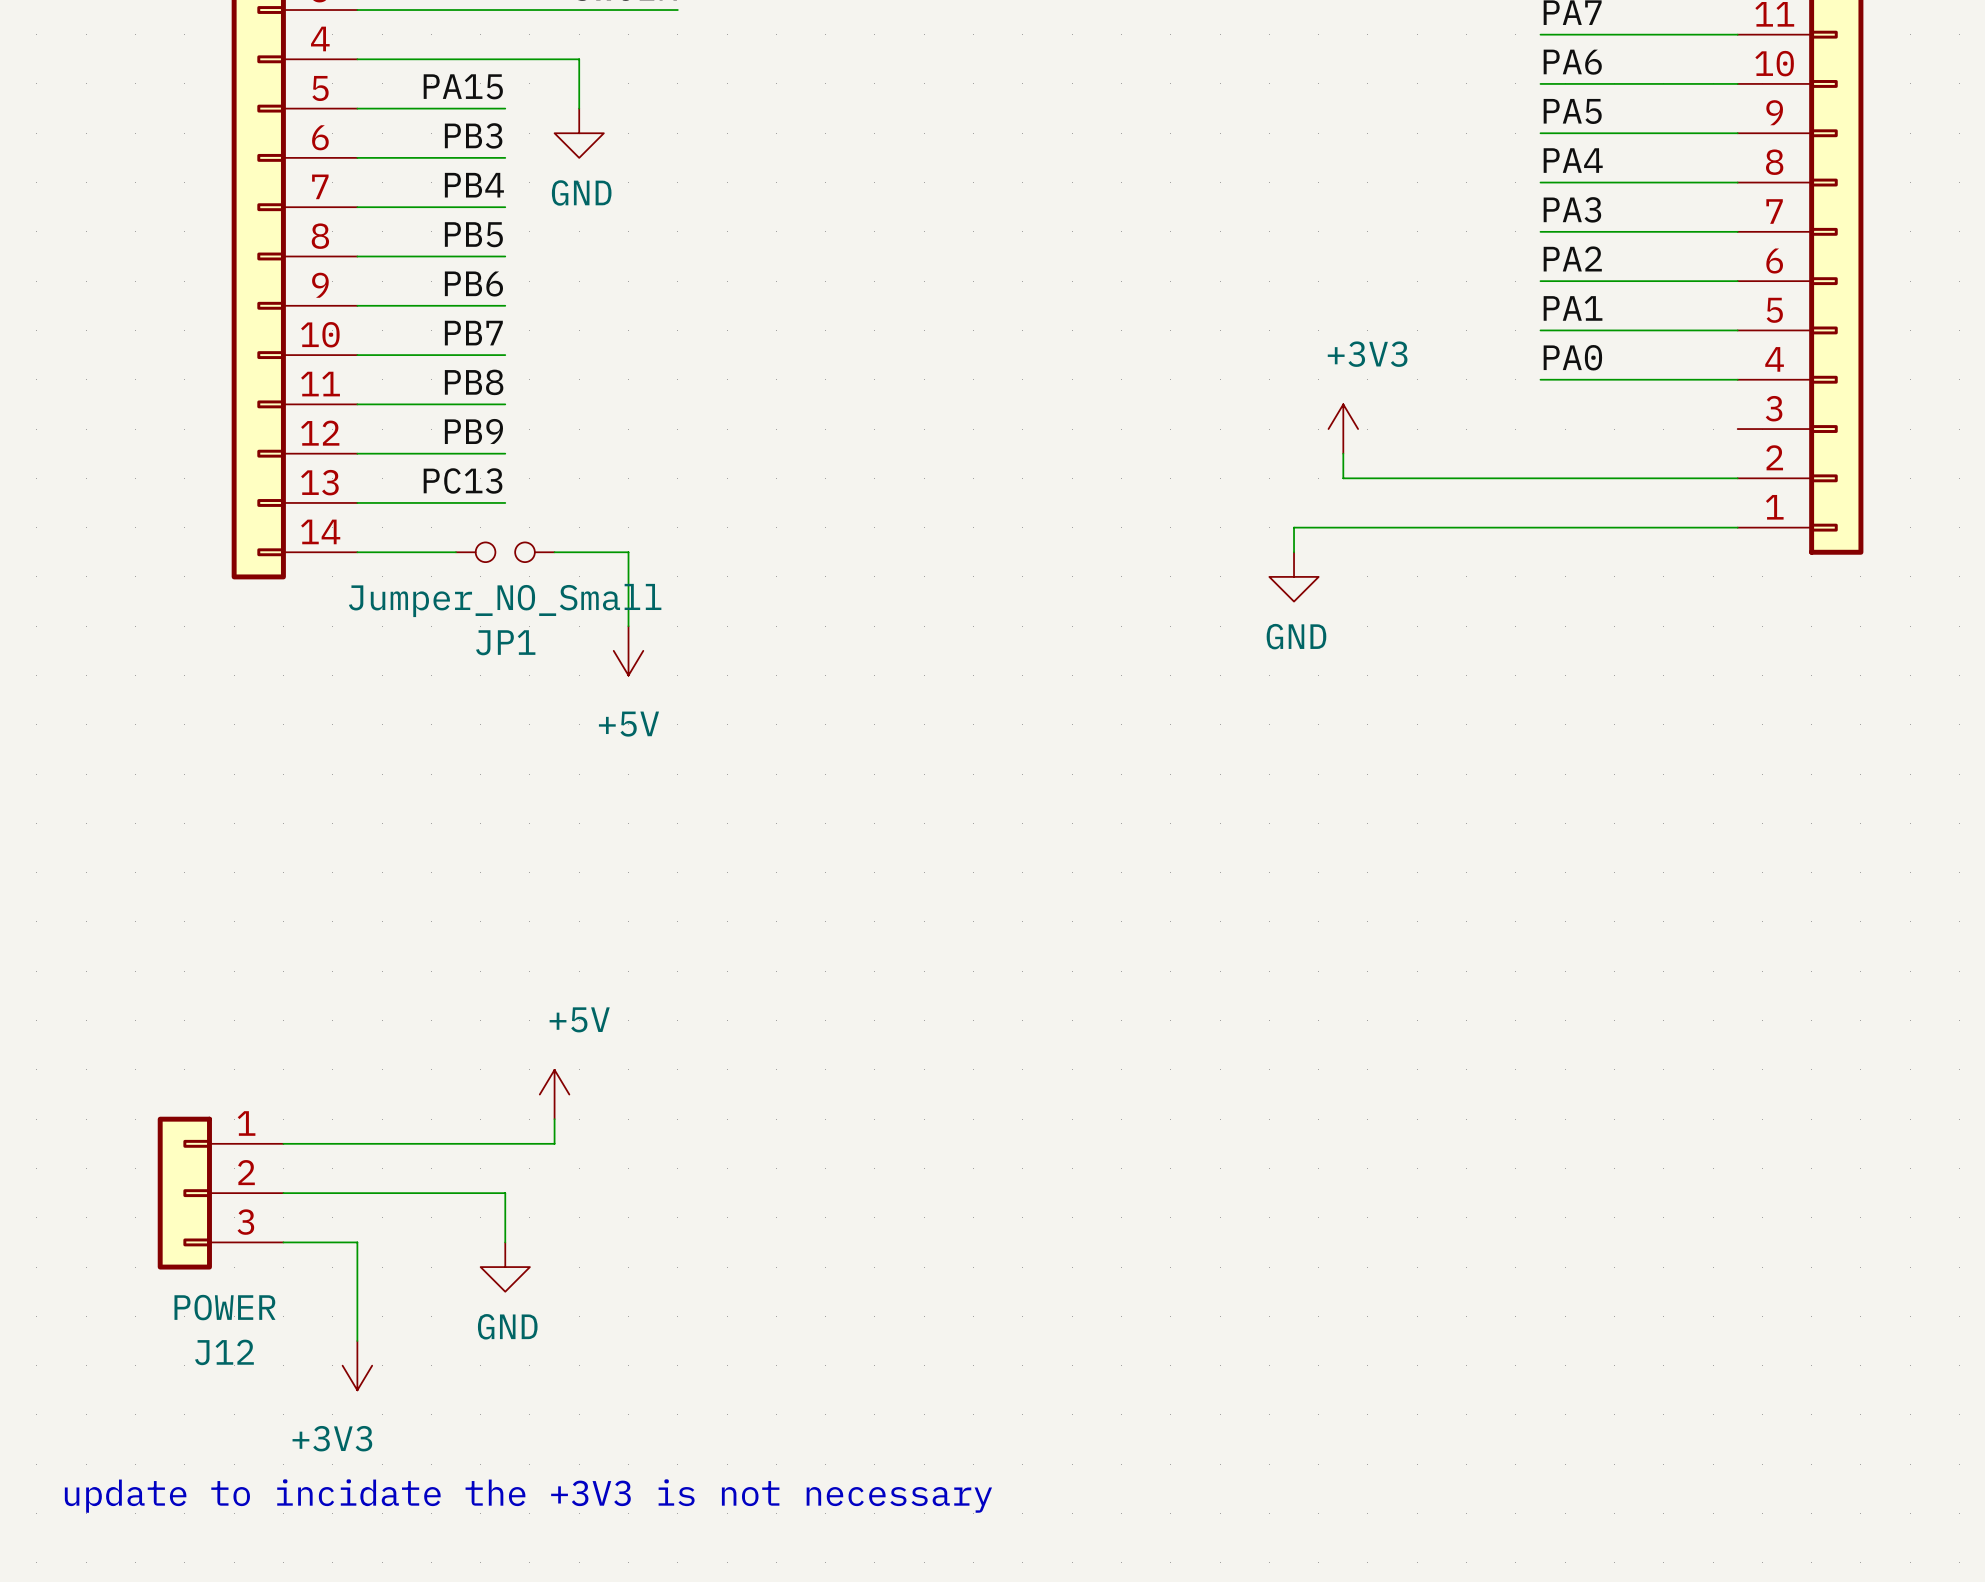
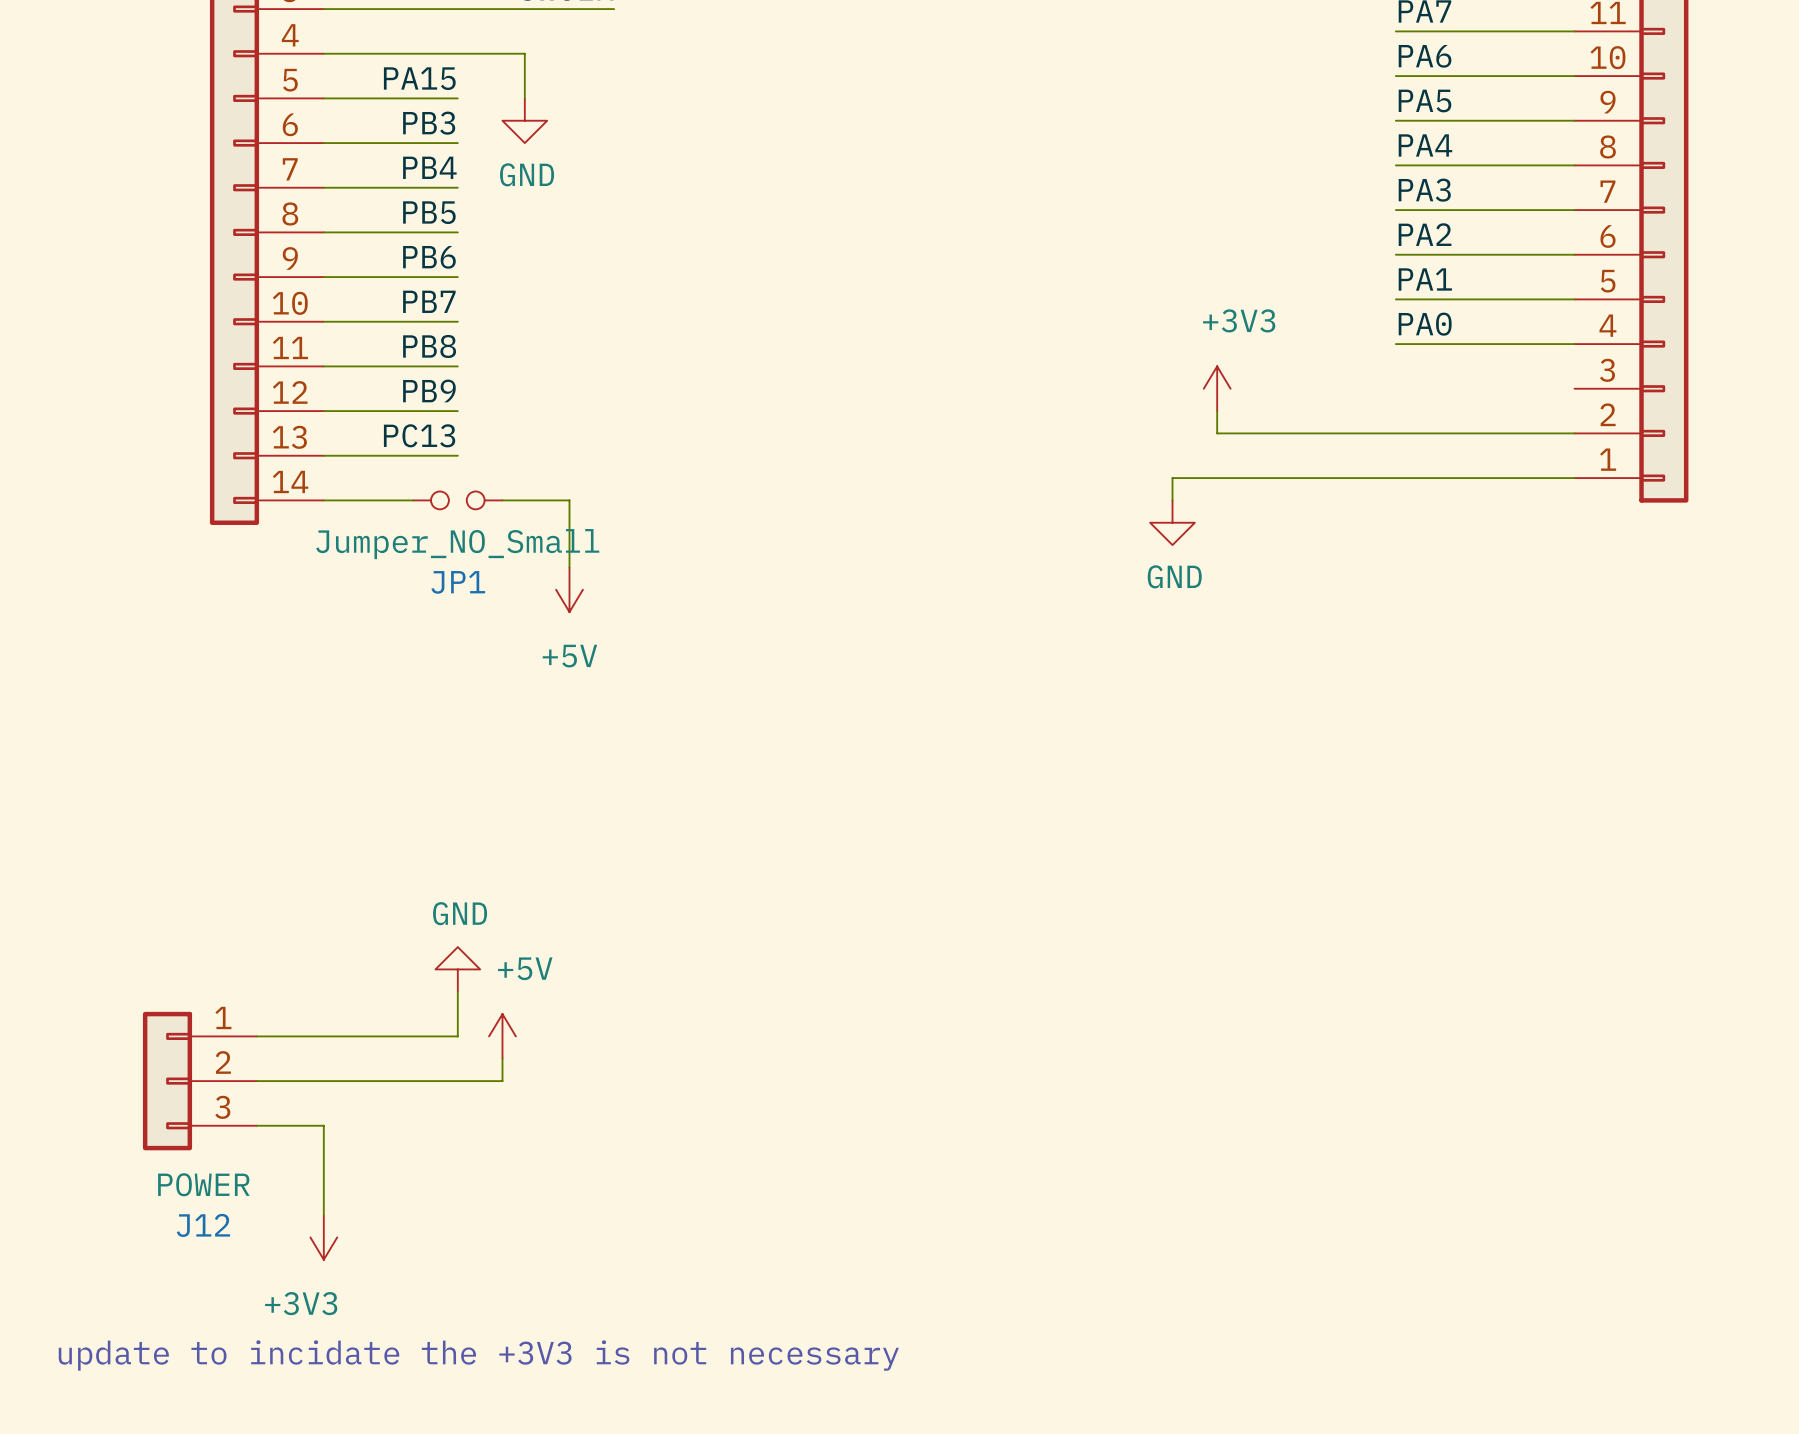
power symbol position: +5V (554, 1094) -> +5V (502, 1036)
wire: (554, 1119) (554, 1143) (505, 1143) -> (457, 991) (457, 1036)
wire: (505, 1193) (505, 1242) -> (457, 1081) (502, 1081) (502, 1058)
power symbol rotation: 0° (505, 1267) -> 180° (457, 969)
power symbol position: GND (505, 1267) -> GND (457, 969)

